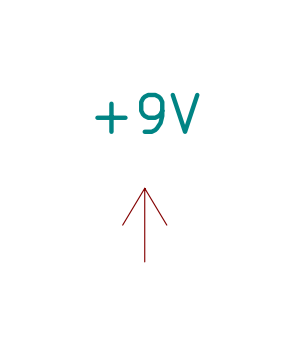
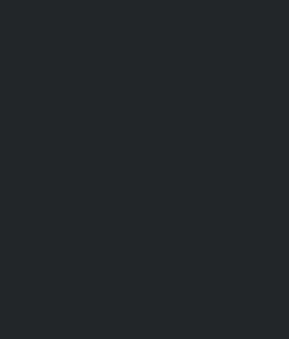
power symbol: +9V (144, 225) -> none

